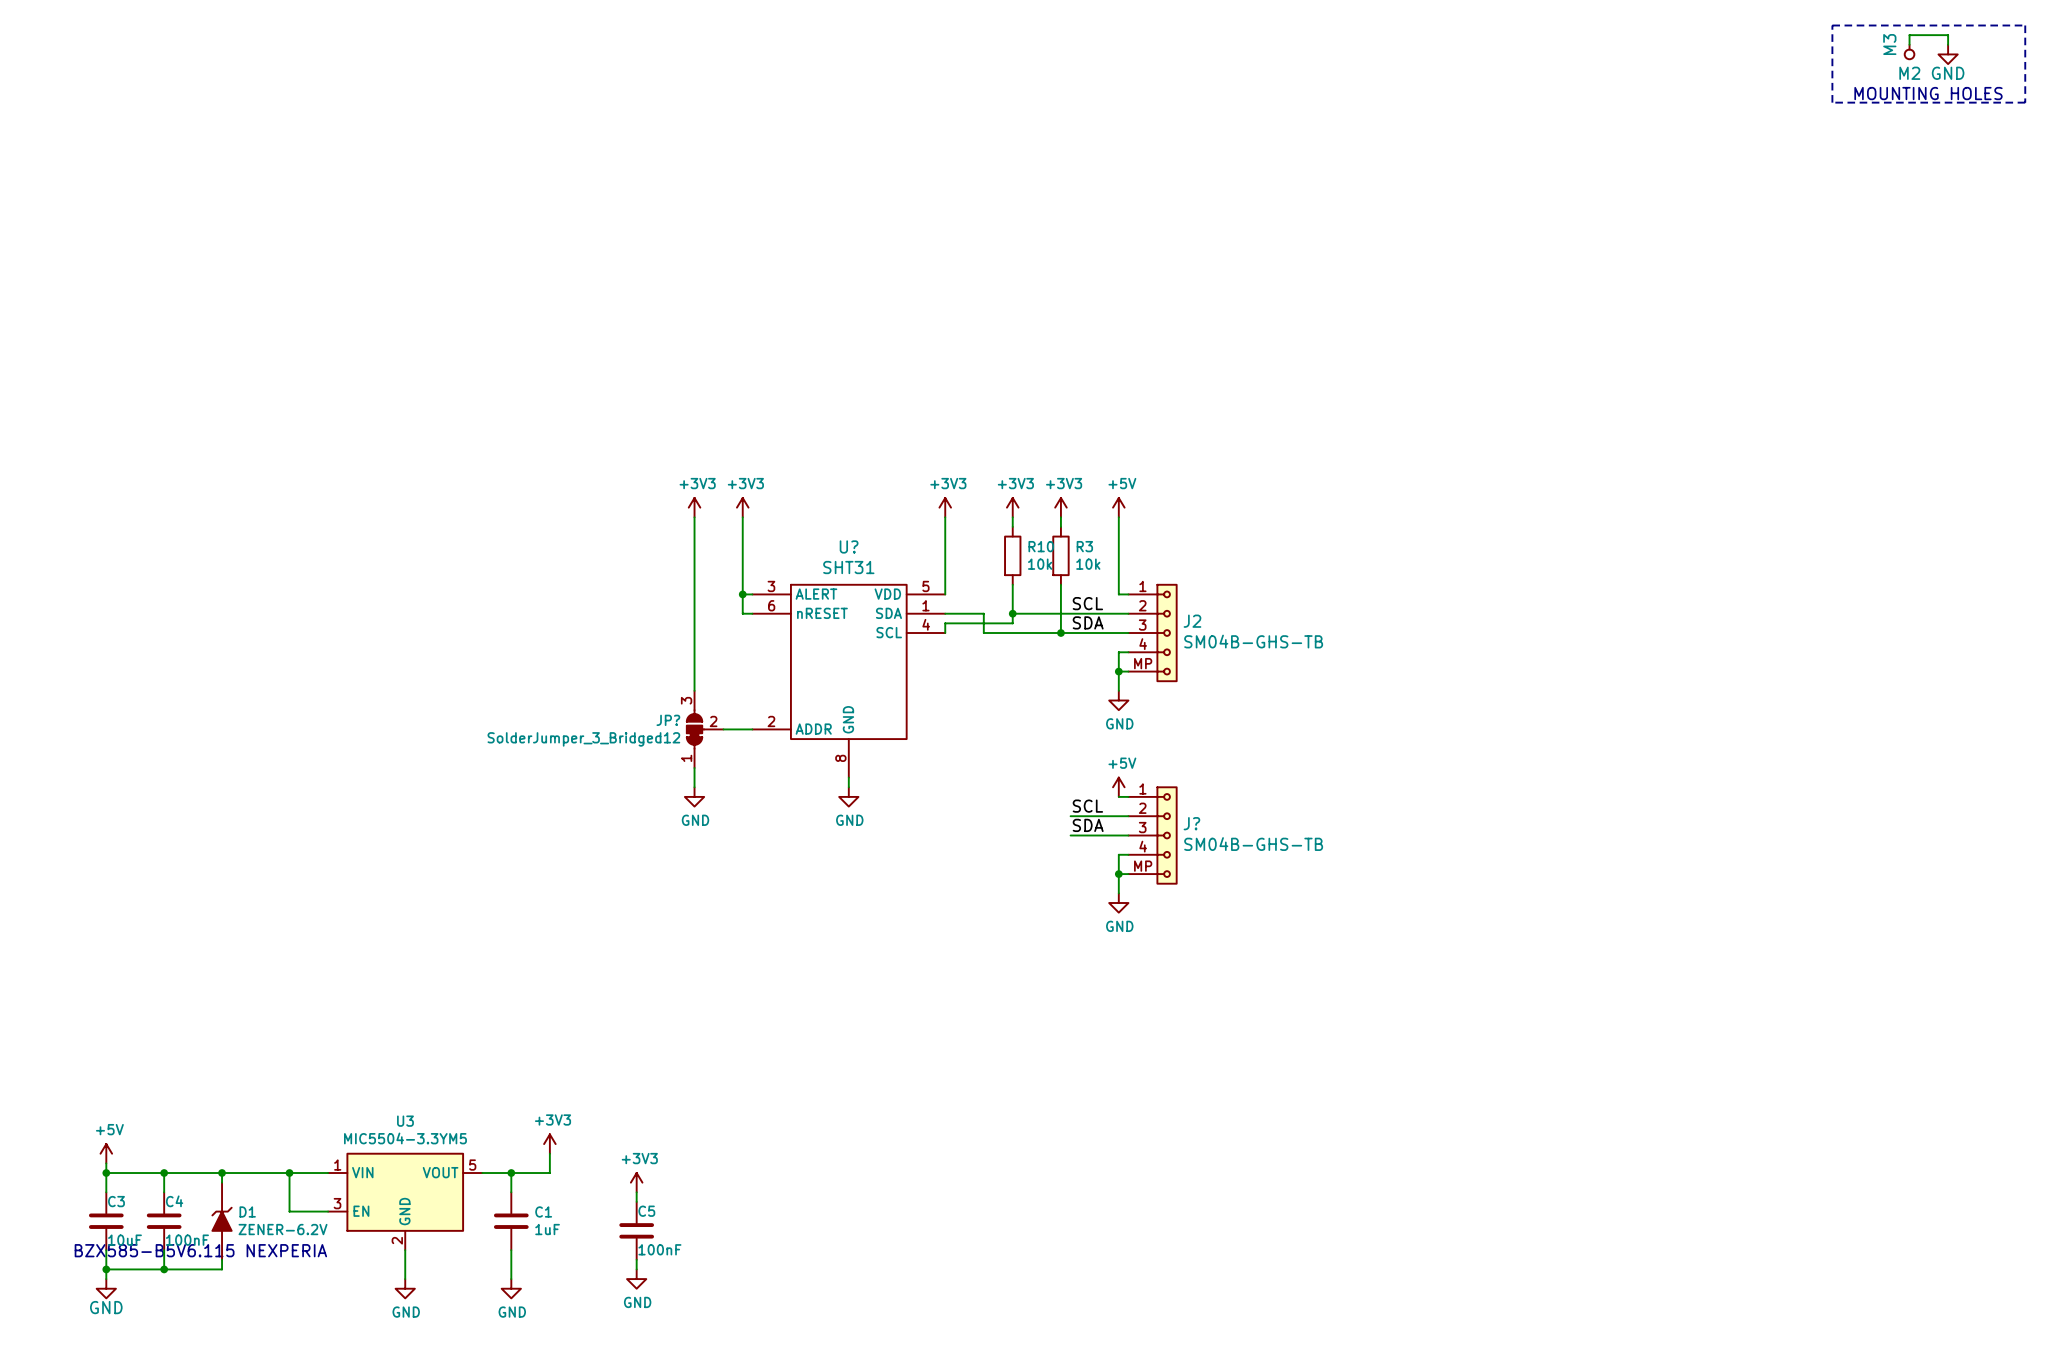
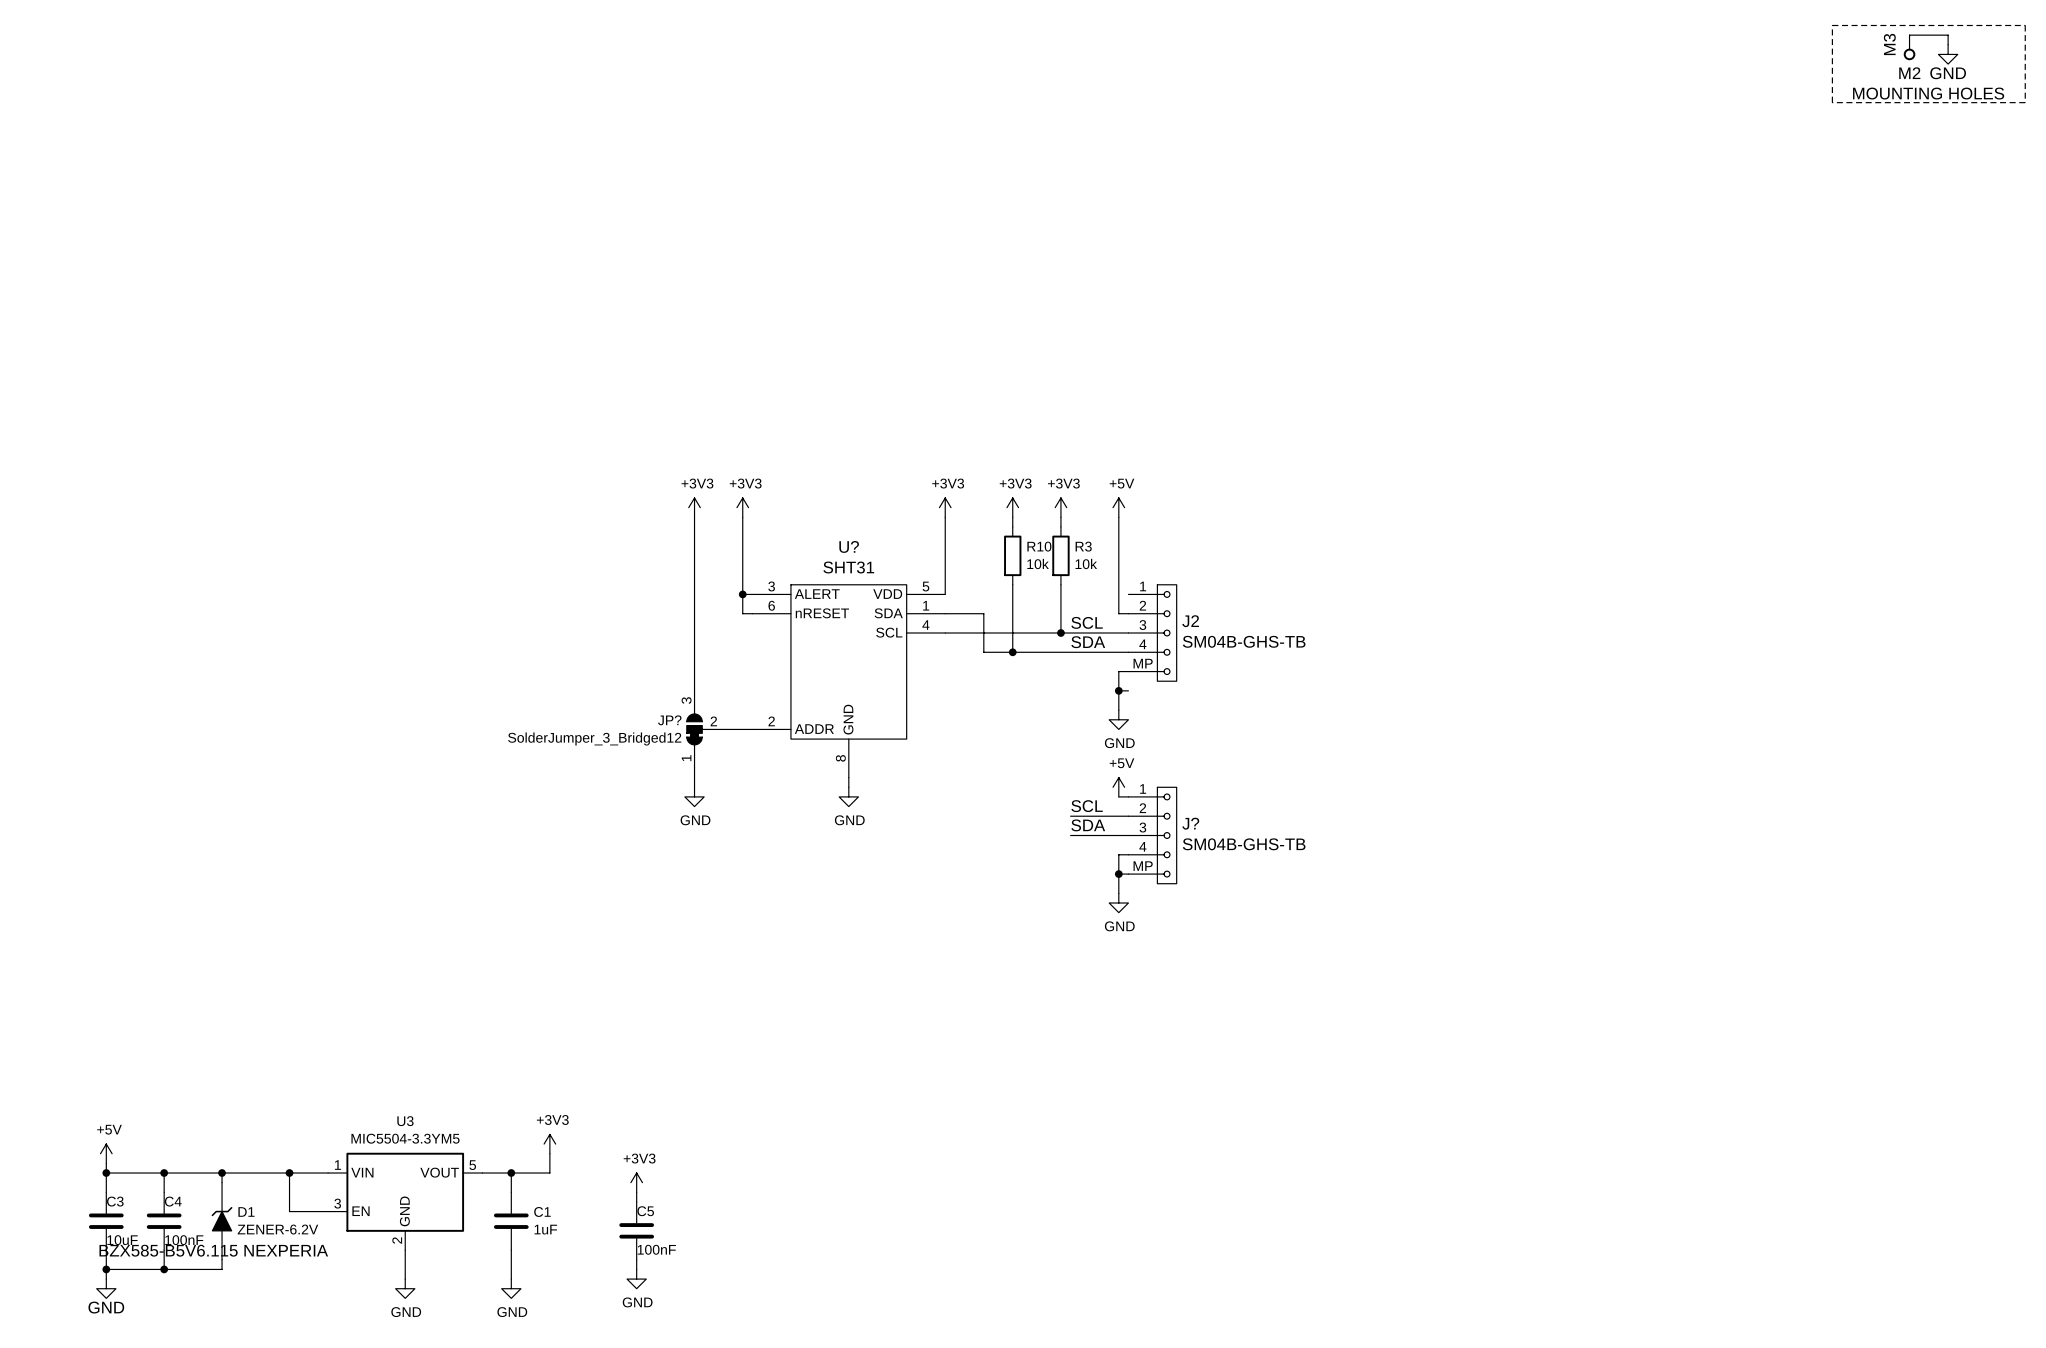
wire: (1118, 594) (1128, 594) -> (1118, 594) (1118, 613)
label: SCL (1087, 603) -> none
wire: (1012, 613) (1118, 613) -> none
junction position: (1012, 613) -> (1012, 652)
label: SDA (1088, 622) -> SCL (1087, 622)
wire: (1012, 623) (945, 623) (945, 633) -> (1012, 623) (1012, 652)
label: none -> SDA (1088, 642)
wire: (1118, 652) (1118, 671) -> (1118, 652) (983, 652) (983, 633) (945, 633)
junction position: (1118, 671) -> (1118, 690)
wire: none -> (1128, 690) (1118, 690) (1118, 710)
power symbol position: GND (1118, 700) -> GND (1118, 719)

